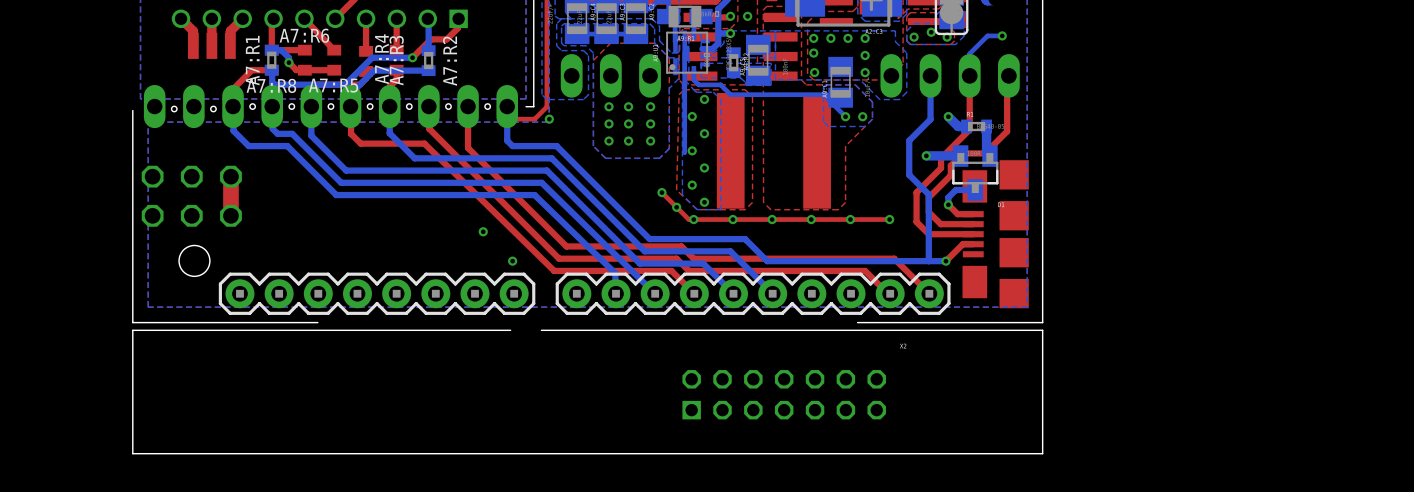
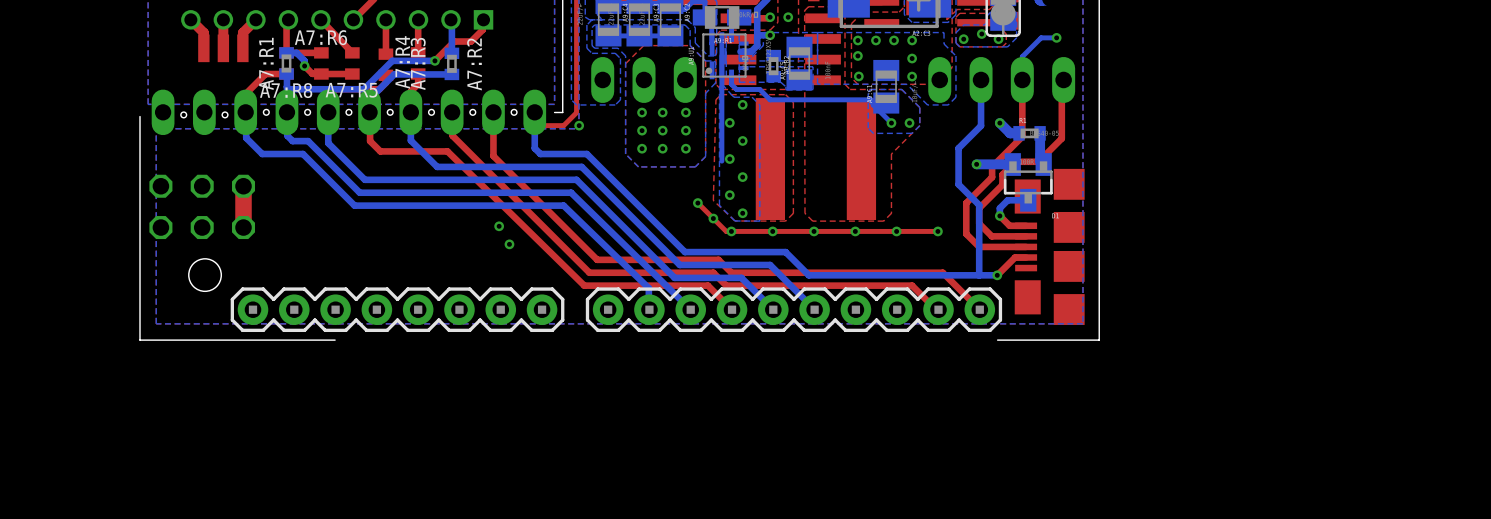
via position: (512, 261) -> (499, 226)
board edge: (946, 322) (857, 322) -> none
board edge: (541, 330) (1042, 330) (1042, 453) (132, 453) (132, 330) (510, 330) -> none
part: (784, 394) -> none

